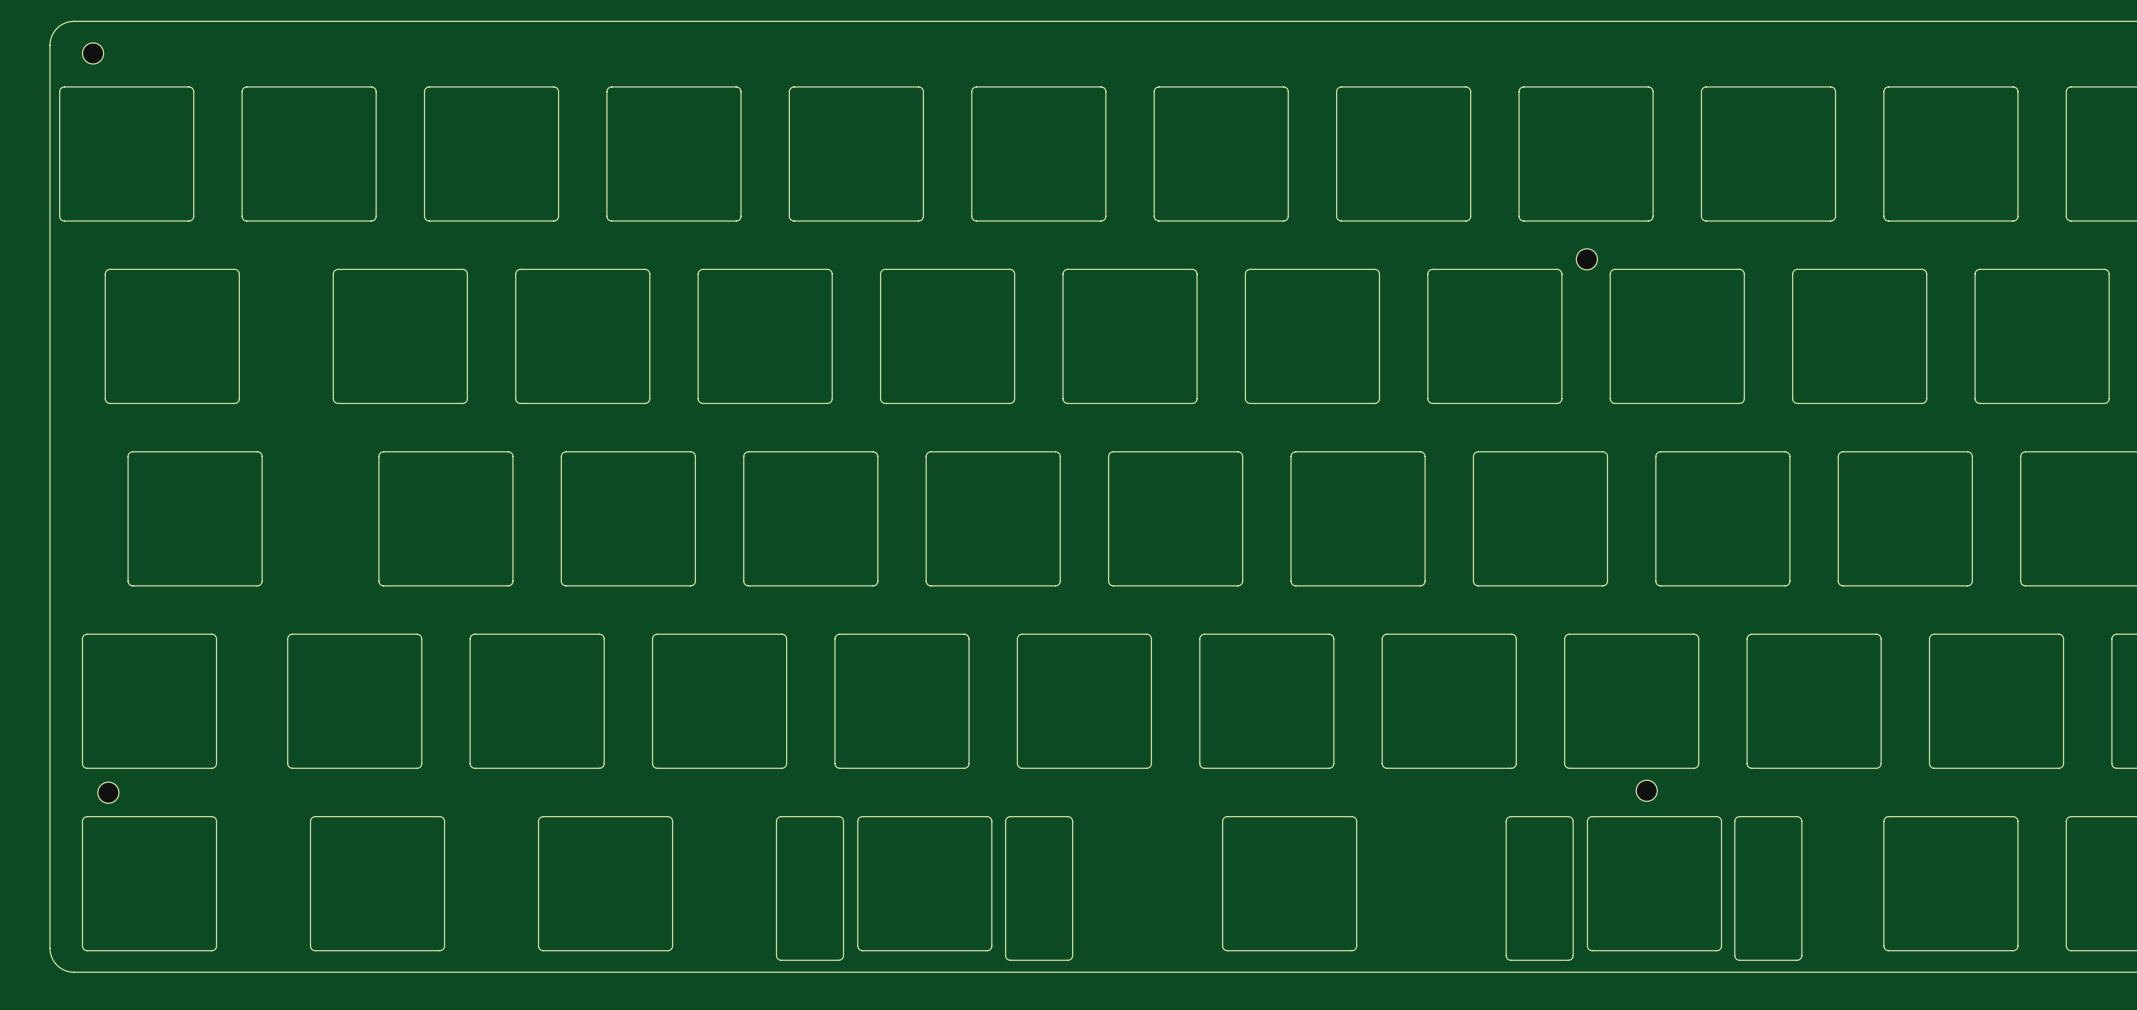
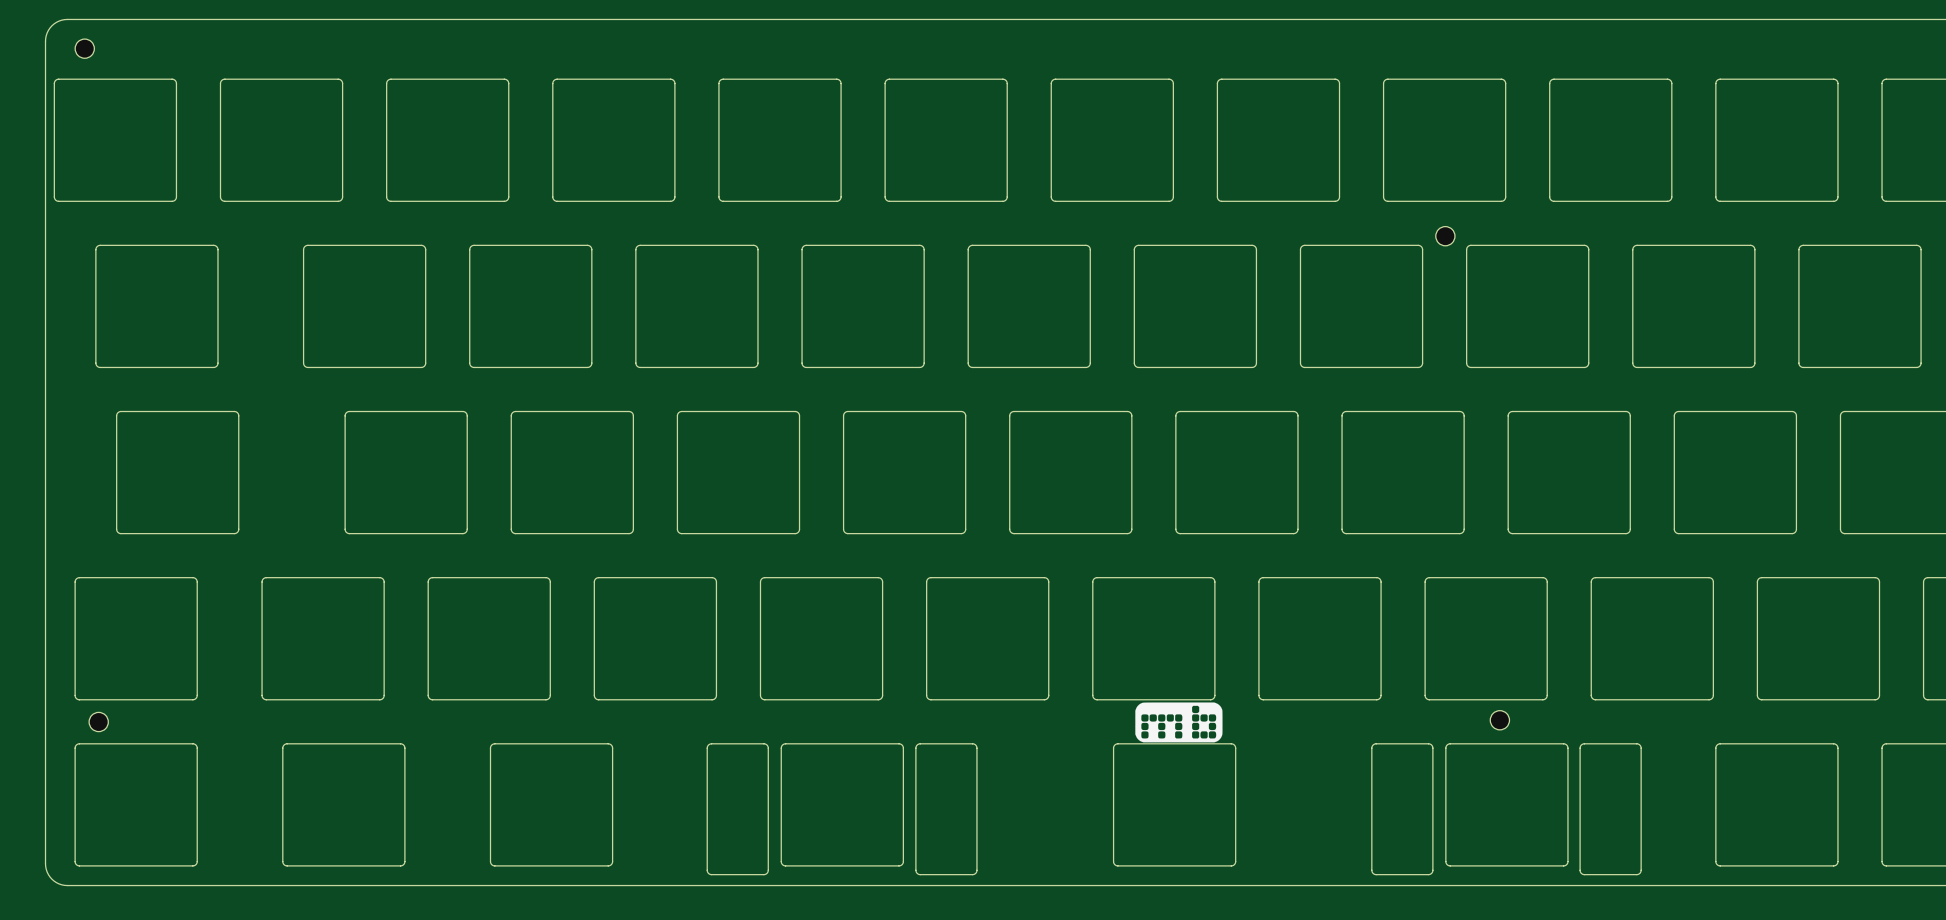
drawing: none -> [1135, 702, 1223, 743]

